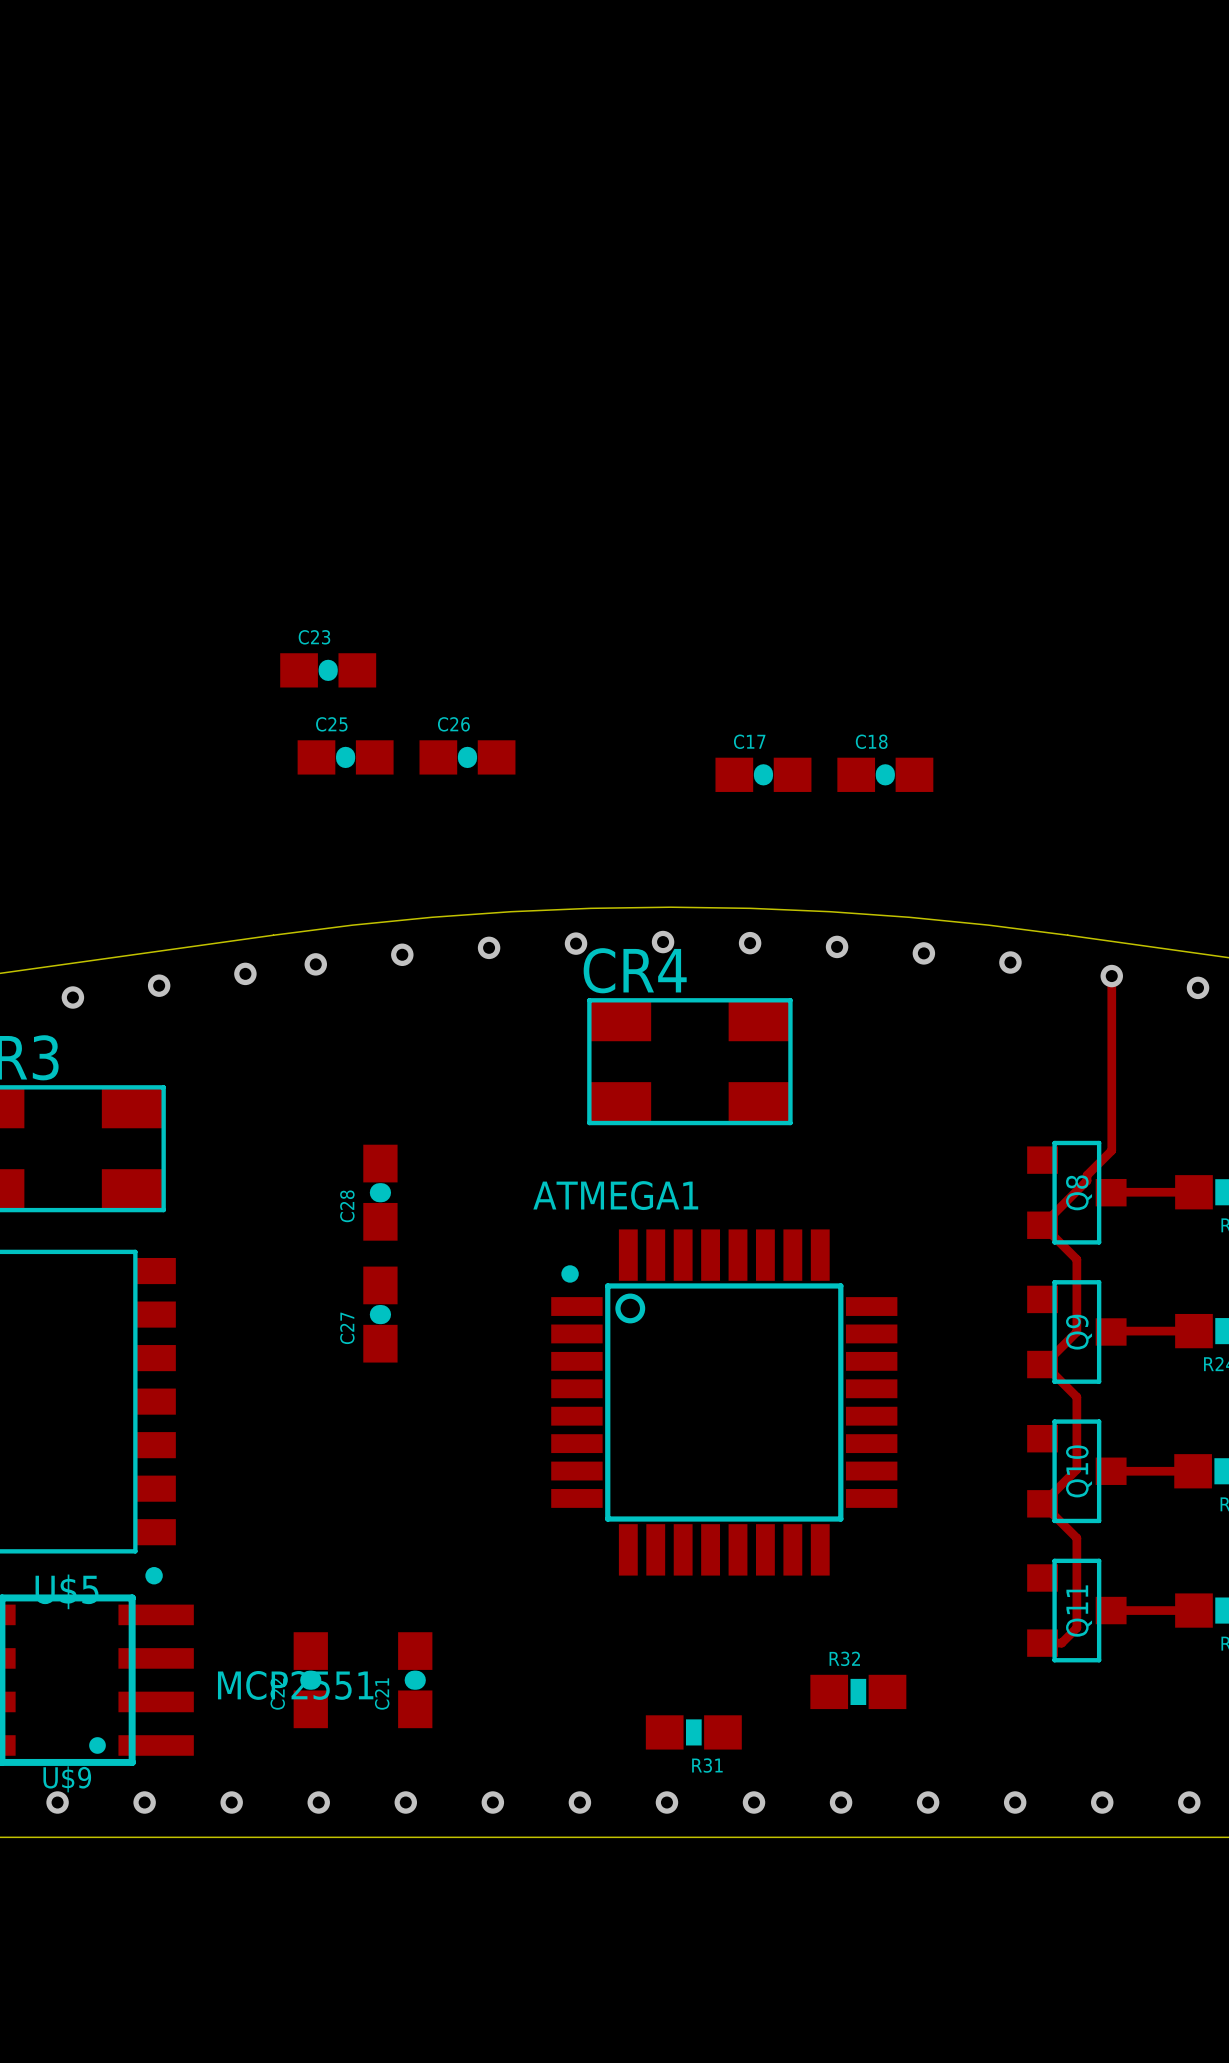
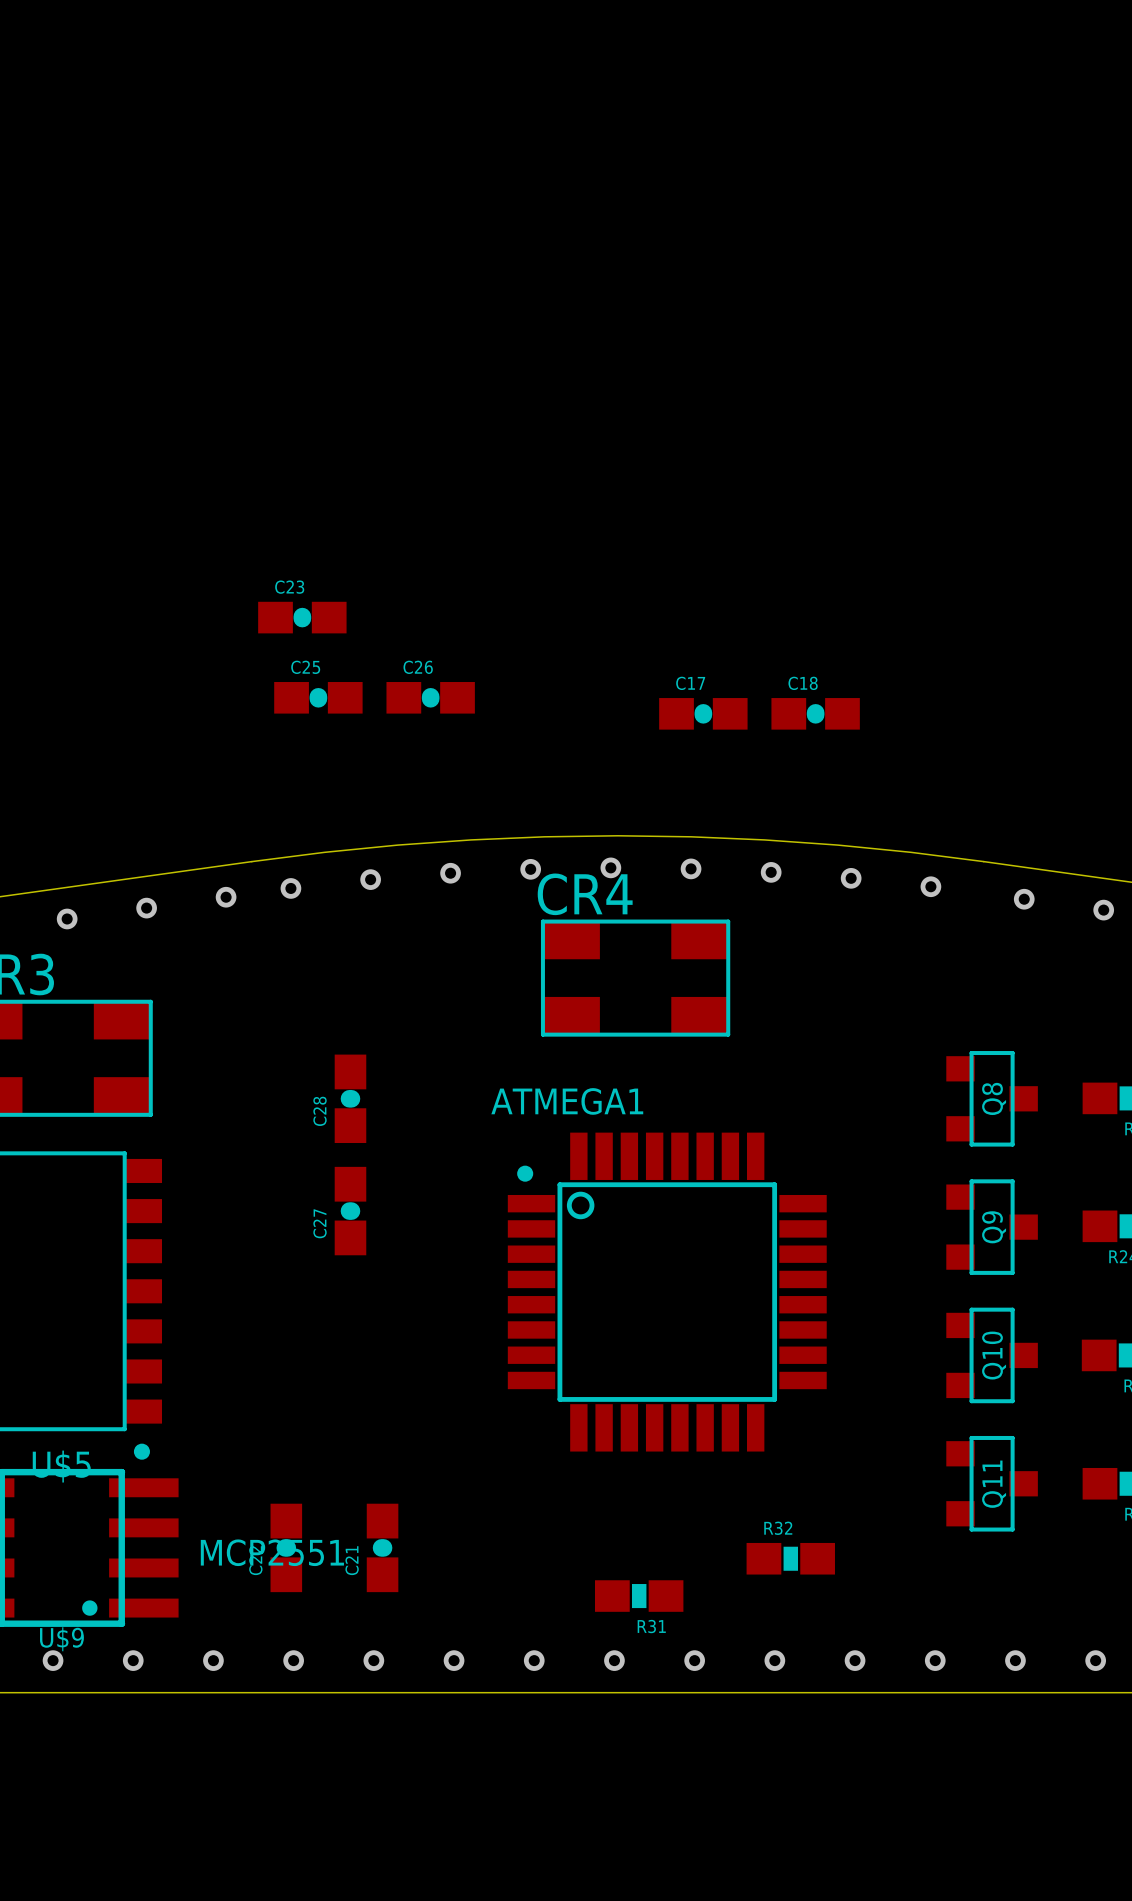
track: (1111, 976) (1111, 1150) (1087, 1175) (1087, 1180) (1042, 1225) (1076, 1259) (1076, 1331) (1044, 1364) -> none
track: (1111, 1192) (1193, 1192) -> none
track: (1193, 1331) (1111, 1331) -> none
track: (1044, 1364) (1076, 1397) (1076, 1469) (1042, 1503) (1076, 1538) (1076, 1627) (1061, 1643) (1042, 1643) -> none
track: (1111, 1471) (1193, 1471) -> none
track: (1111, 1610) (1193, 1610) -> none

